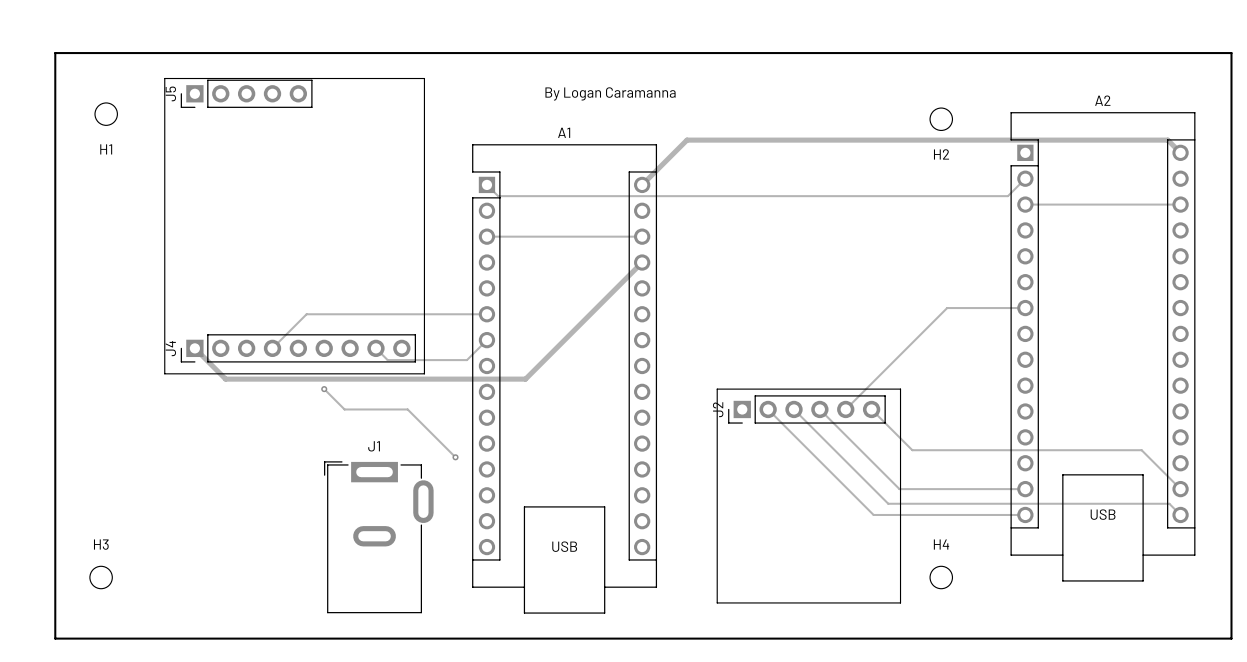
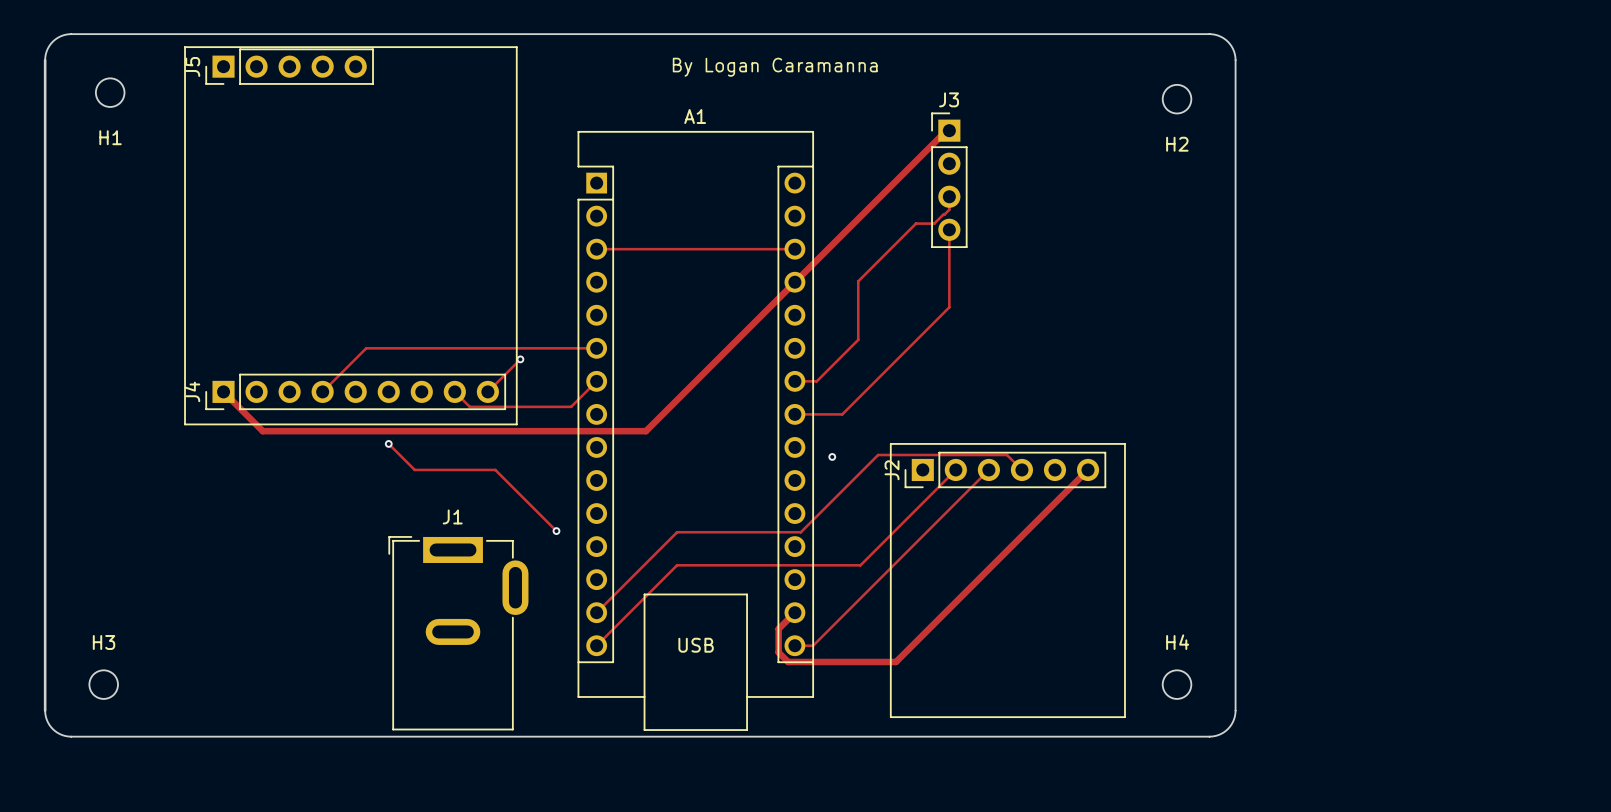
board edge: (55, 88) (55, 53) (1231, 53) (1231, 638) (55, 638) (55, 597) -> (45, 60) (46, 51) (52, 41) (62, 35) (71, 34) (1209, 34) (1218, 35) (1227, 41) (1232, 48) (1235, 60) (1235, 710) (1231, 724) (1220, 734) (1209, 736) (71, 736) (59, 734) (52, 729) (47, 721) (45, 710)
track: none -> (949, 130) (946, 130) (794, 282)
track: (1180, 152) (1167, 140) (686, 140) (642, 184) -> none
track: (1025, 178) (1007, 196) (498, 196) (486, 184) -> none
J3: none -> (949, 180)
track: none -> (949, 196) (949, 209) (944, 214) (934, 223) (916, 223) (858, 281) (858, 339) (816, 381) (794, 381)
track: (1025, 204) (1180, 204) -> none
track: none -> (949, 229) (949, 307) (842, 414) (794, 414)
track: (1025, 308) (947, 308) (845, 409) -> none
track: none -> (520, 359) (487, 391)
via: none -> (520, 359)
A2: (1102, 346) -> none
via: none -> (832, 456)
track: (768, 409) (873, 514) (1025, 514) -> (955, 469) (860, 565) (677, 565) (596, 645)
track: (794, 409) (888, 503) (1169, 503) (1180, 514) -> (988, 469) (813, 645) (794, 645)
track: (819, 409) (899, 489) (1025, 489) -> (1021, 469) (1006, 454) (878, 454) (800, 532) (677, 532) (596, 612)
track: (871, 409) (912, 450) (1141, 450) (1180, 489) -> (1088, 469) (896, 662) (788, 662) (778, 652) (778, 628) (794, 612)

